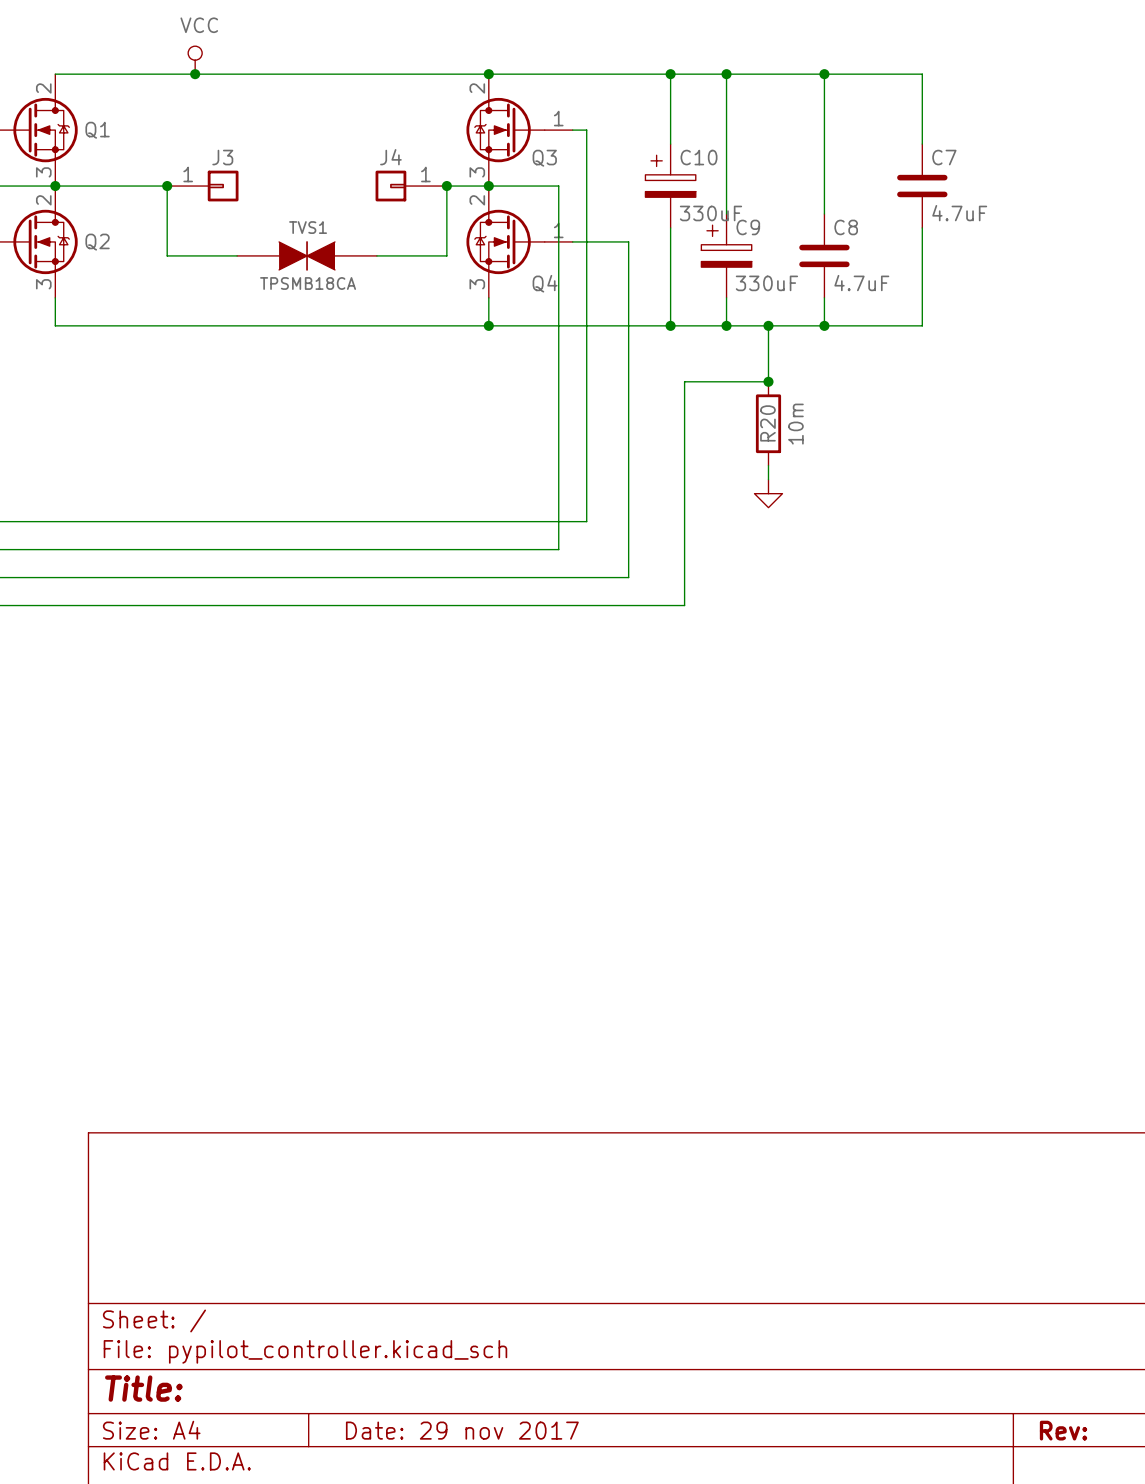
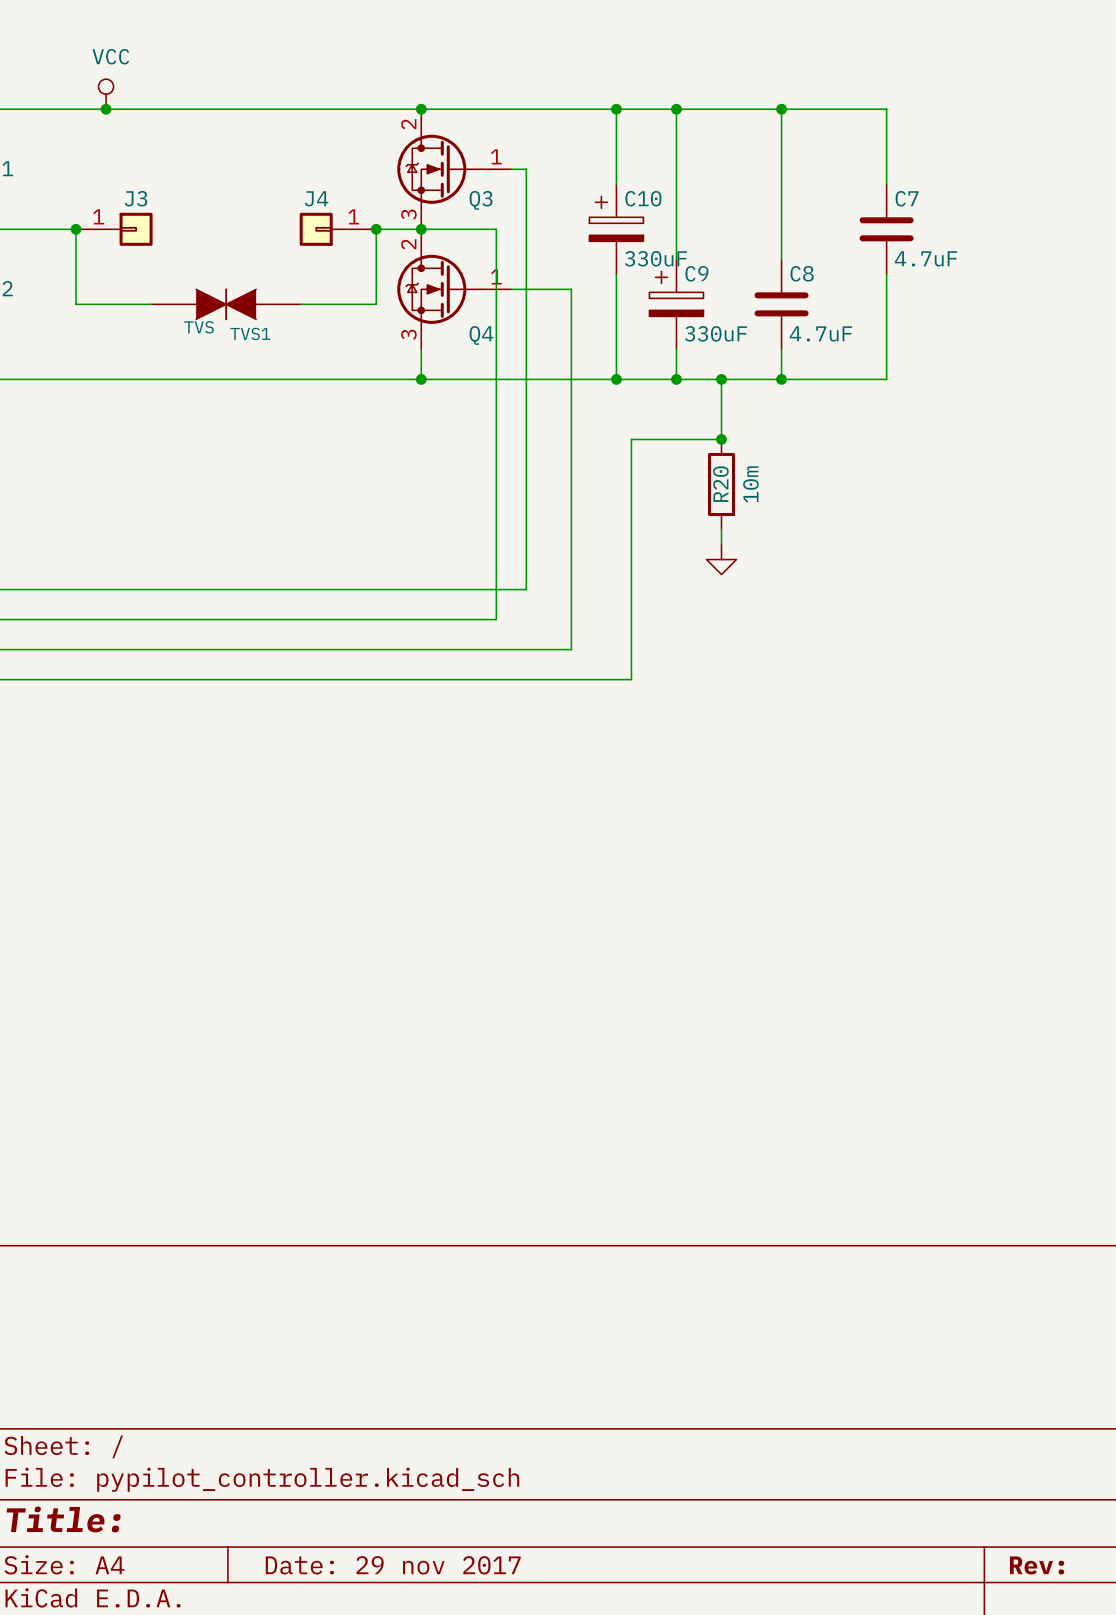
TVS1 name position: TVS1 (308, 227) -> TVS1 (250, 333)
TVS1 value: TPSMB18CA (308, 283) -> TVS (198, 327)

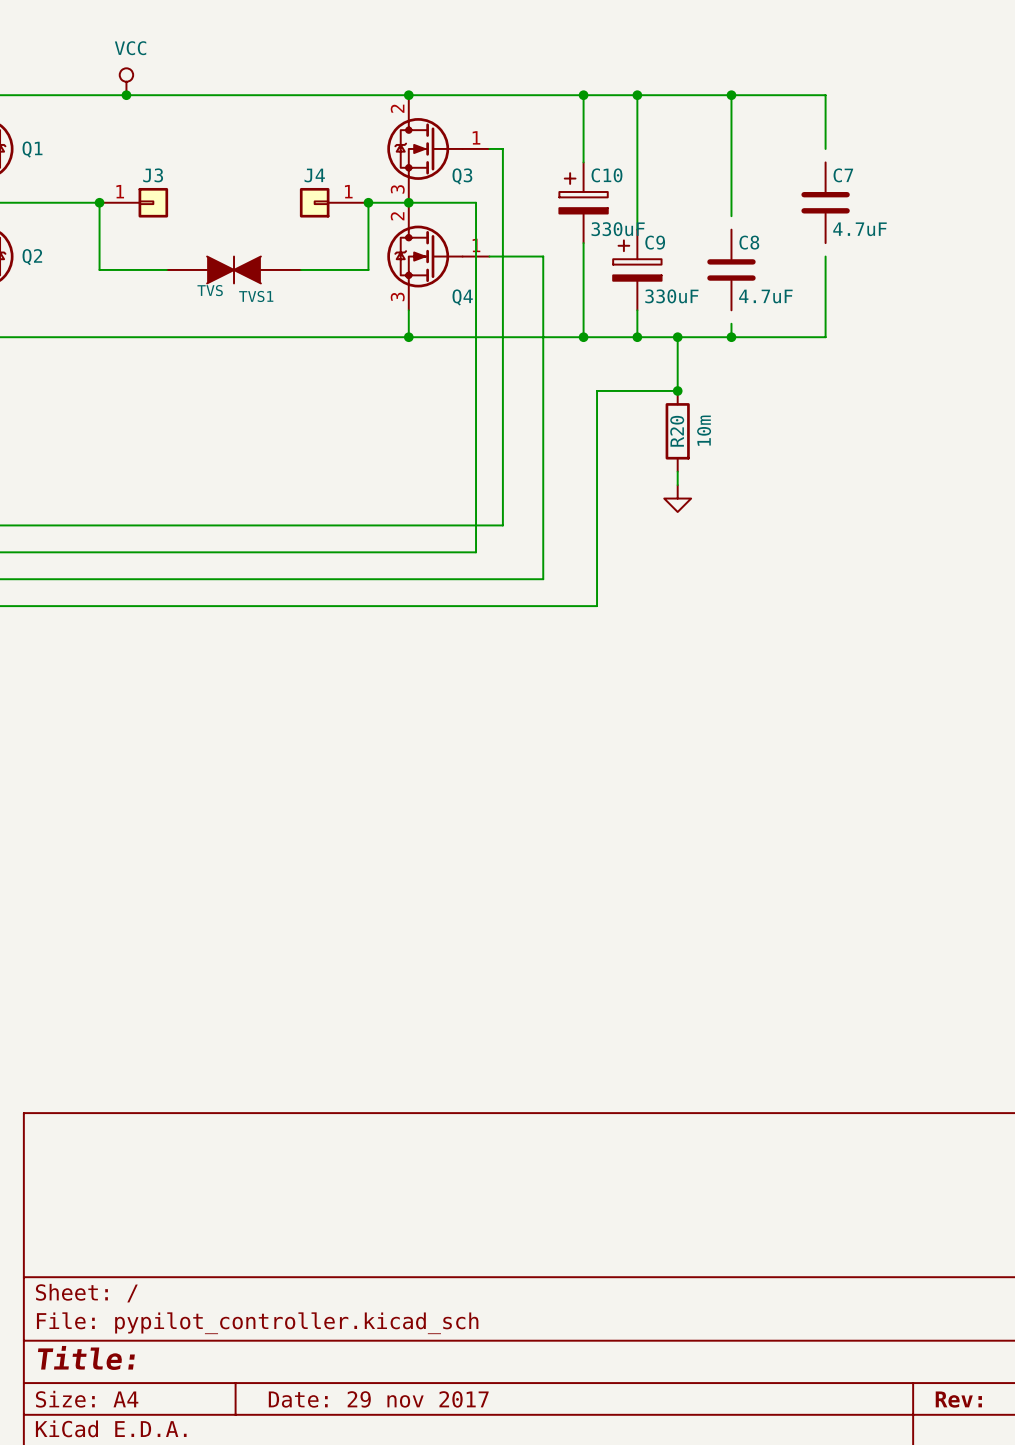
wire: (886, 169) (886, 184) -> none
wire: (781, 244) (781, 259) -> none
wire: (886, 274) (886, 289) -> none
wire: (781, 349) (781, 364) -> none

